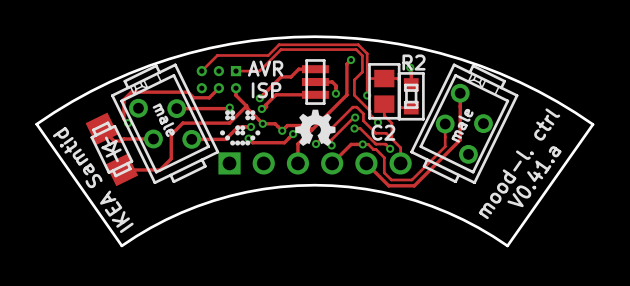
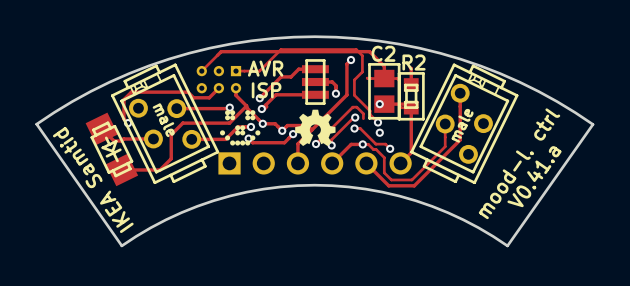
track: (217, 55) (268, 55) (279, 44) (358, 44) (367, 53) (367, 95) -> (217, 55) (221, 51) (369, 51) (384, 66) (384, 78)
via: (410, 67) -> none
via position: (367, 95) -> (379, 104)
track: (384, 104) (384, 115) (391, 123) (391, 139) -> none
track: (363, 118) (375, 133) (386, 133) (400, 147) (400, 163) -> (379, 104) (407, 104) (411, 107) (411, 152) (400, 163)
via: none -> (379, 132)
C2 name position: C2 (383, 132) -> C2 (383, 53)

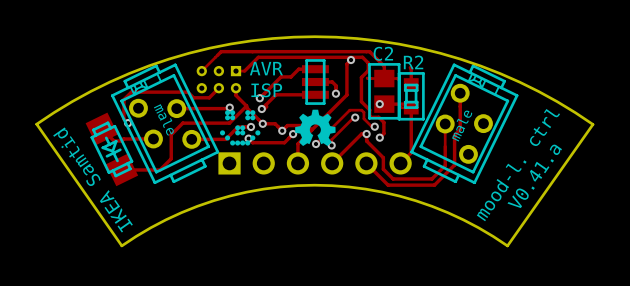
track: (244, 71) (259, 71) (281, 49) (356, 49) (362, 55) (362, 71) (354, 79) (354, 95) (370, 110) (370, 114) (377, 122) -> (244, 71) (258, 57) (362, 57) (368, 63) (368, 70) (361, 77) (361, 101) (369, 110) (370, 117) (378, 117) (383, 122) (383, 133) (379, 137)
track: (349, 110) (352, 107) (356, 107) (363, 113) (363, 118) -> (349, 110) (361, 110) (363, 112) (363, 118) (372, 127)
via: (377, 122) -> none
via: none -> (374, 126)
track: (354, 128) (360, 128) (375, 144) (385, 144) (390, 148) -> none
via: (354, 128) -> none
track: (460, 129) (460, 139) (414, 185) (388, 185) -> (460, 129) (454, 135) (454, 165) (434, 185) (388, 185)
via: (379, 132) -> none
via: none -> (366, 134)
via: none -> (379, 137)
track: (351, 144) (368, 144) (376, 149) (384, 157) (384, 172) (391, 179) (411, 179) (445, 146) -> (351, 144) (361, 134) (366, 134) (366, 141) (383, 157) (383, 169) (393, 178) (431, 178) (445, 165) (445, 146)
via: (362, 144) -> none
via: (390, 148) -> none

